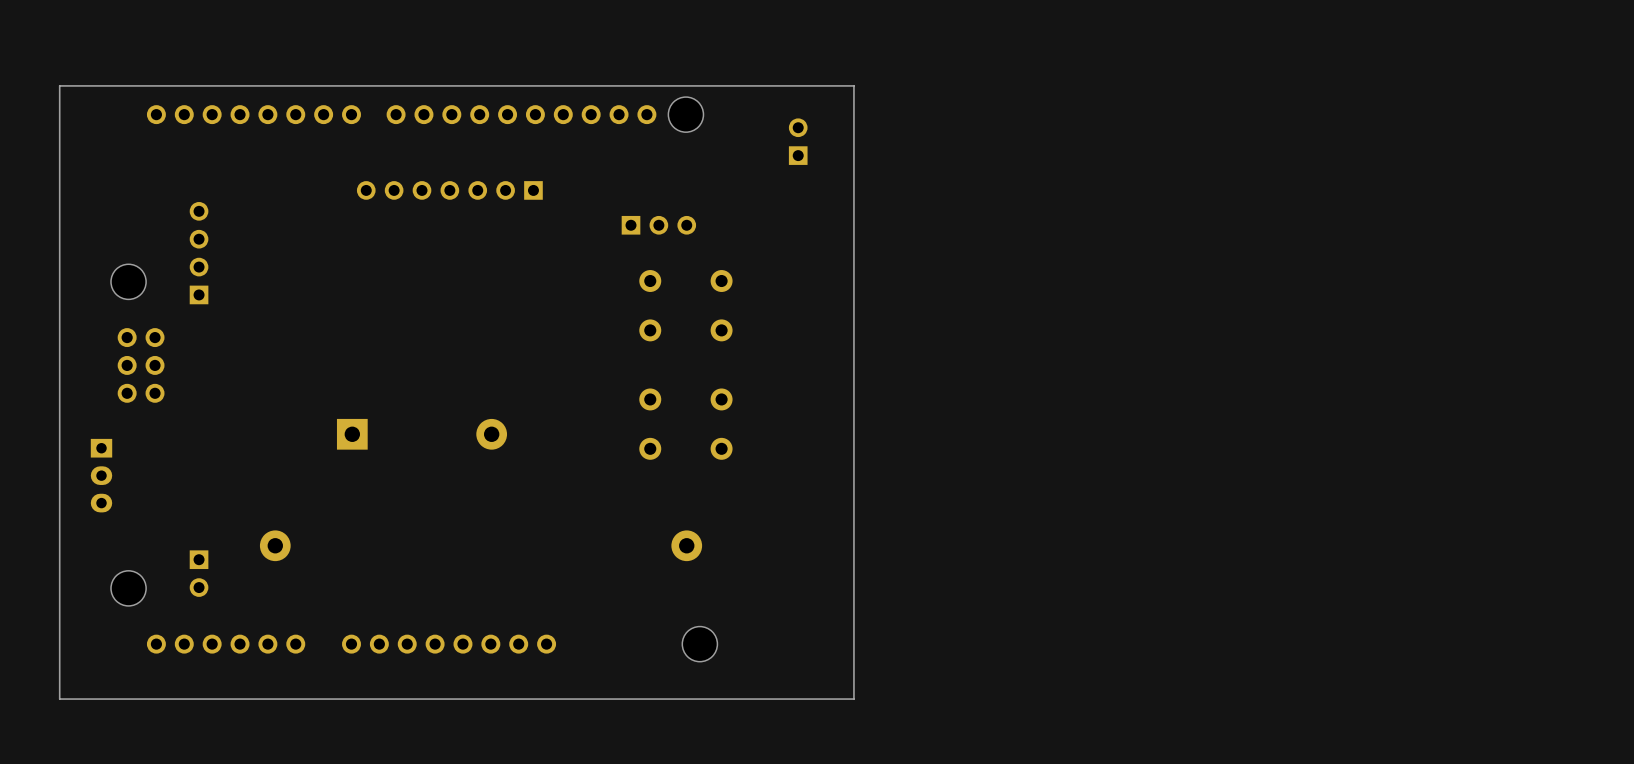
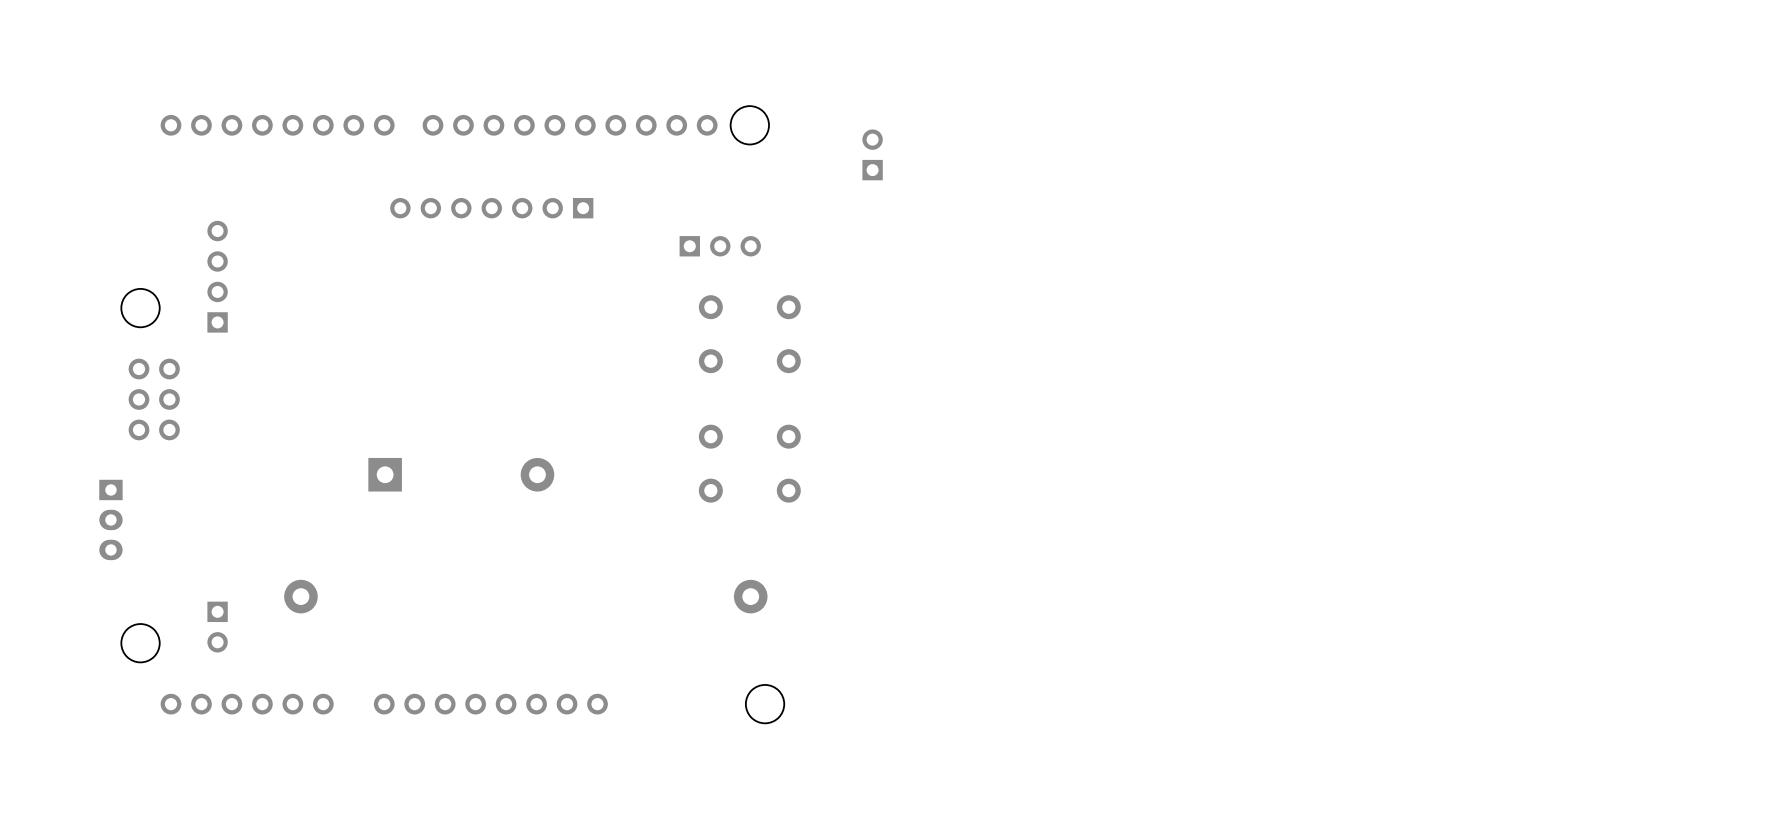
board edge: (853, 85) (853, 699) (59, 699) (59, 85) (853, 85) -> none

